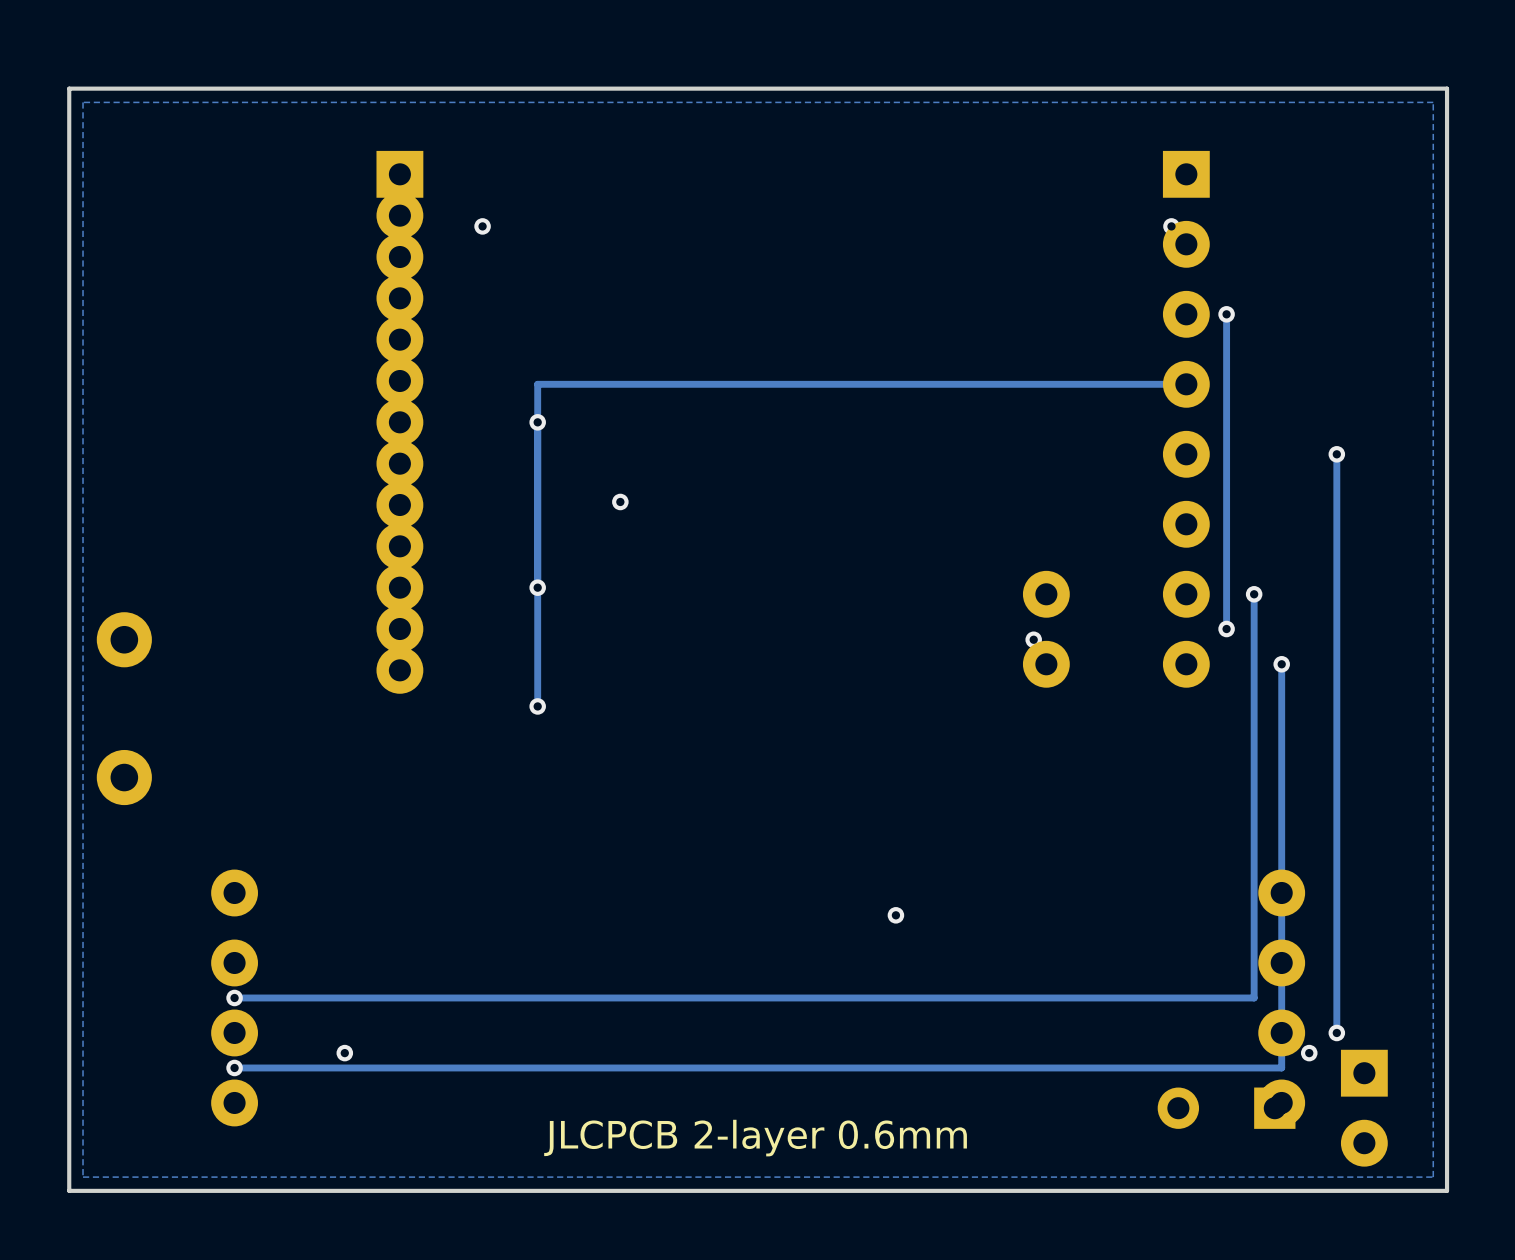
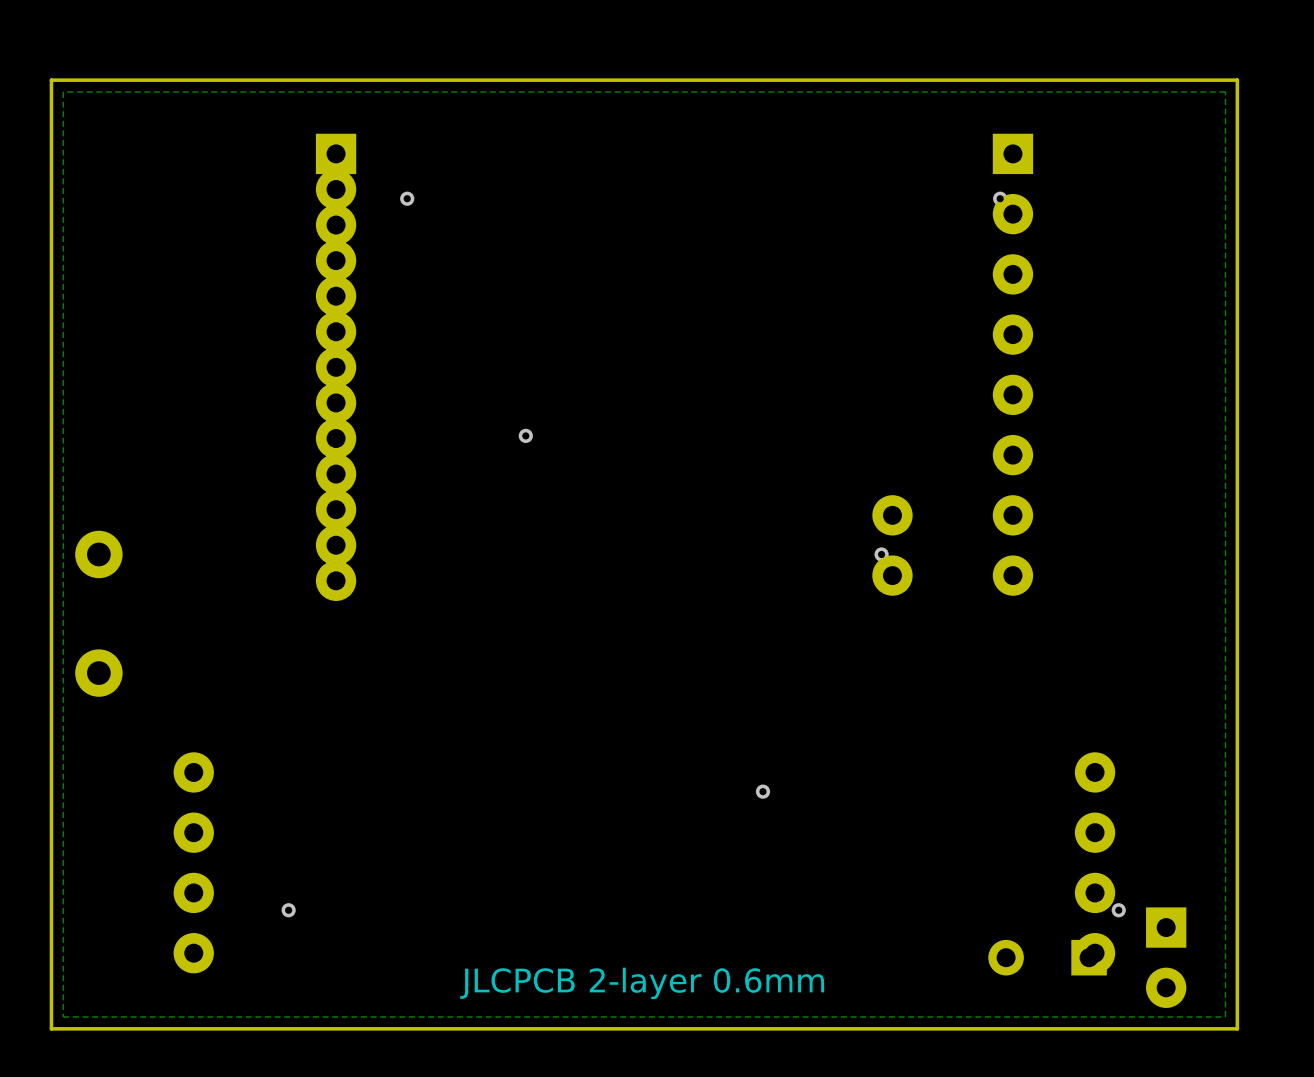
track: (1226, 314) (1226, 629) -> none
via: (1226, 314) -> none
track: (1186, 384) (537, 384) (537, 706) -> none
via: (537, 422) -> none
track: (1336, 454) (1336, 1032) -> none
via: (1336, 454) -> none
via: (537, 587) -> none
track: (1254, 594) (1254, 997) (234, 997) -> none
via: (1254, 594) -> none
via: (1226, 629) -> none
track: (1281, 664) (1281, 1067) (234, 1067) -> none
via: (1281, 664) -> none
via: (537, 706) -> none
via: (234, 997) -> none
via: (1336, 1032) -> none
via: (234, 1067) -> none

